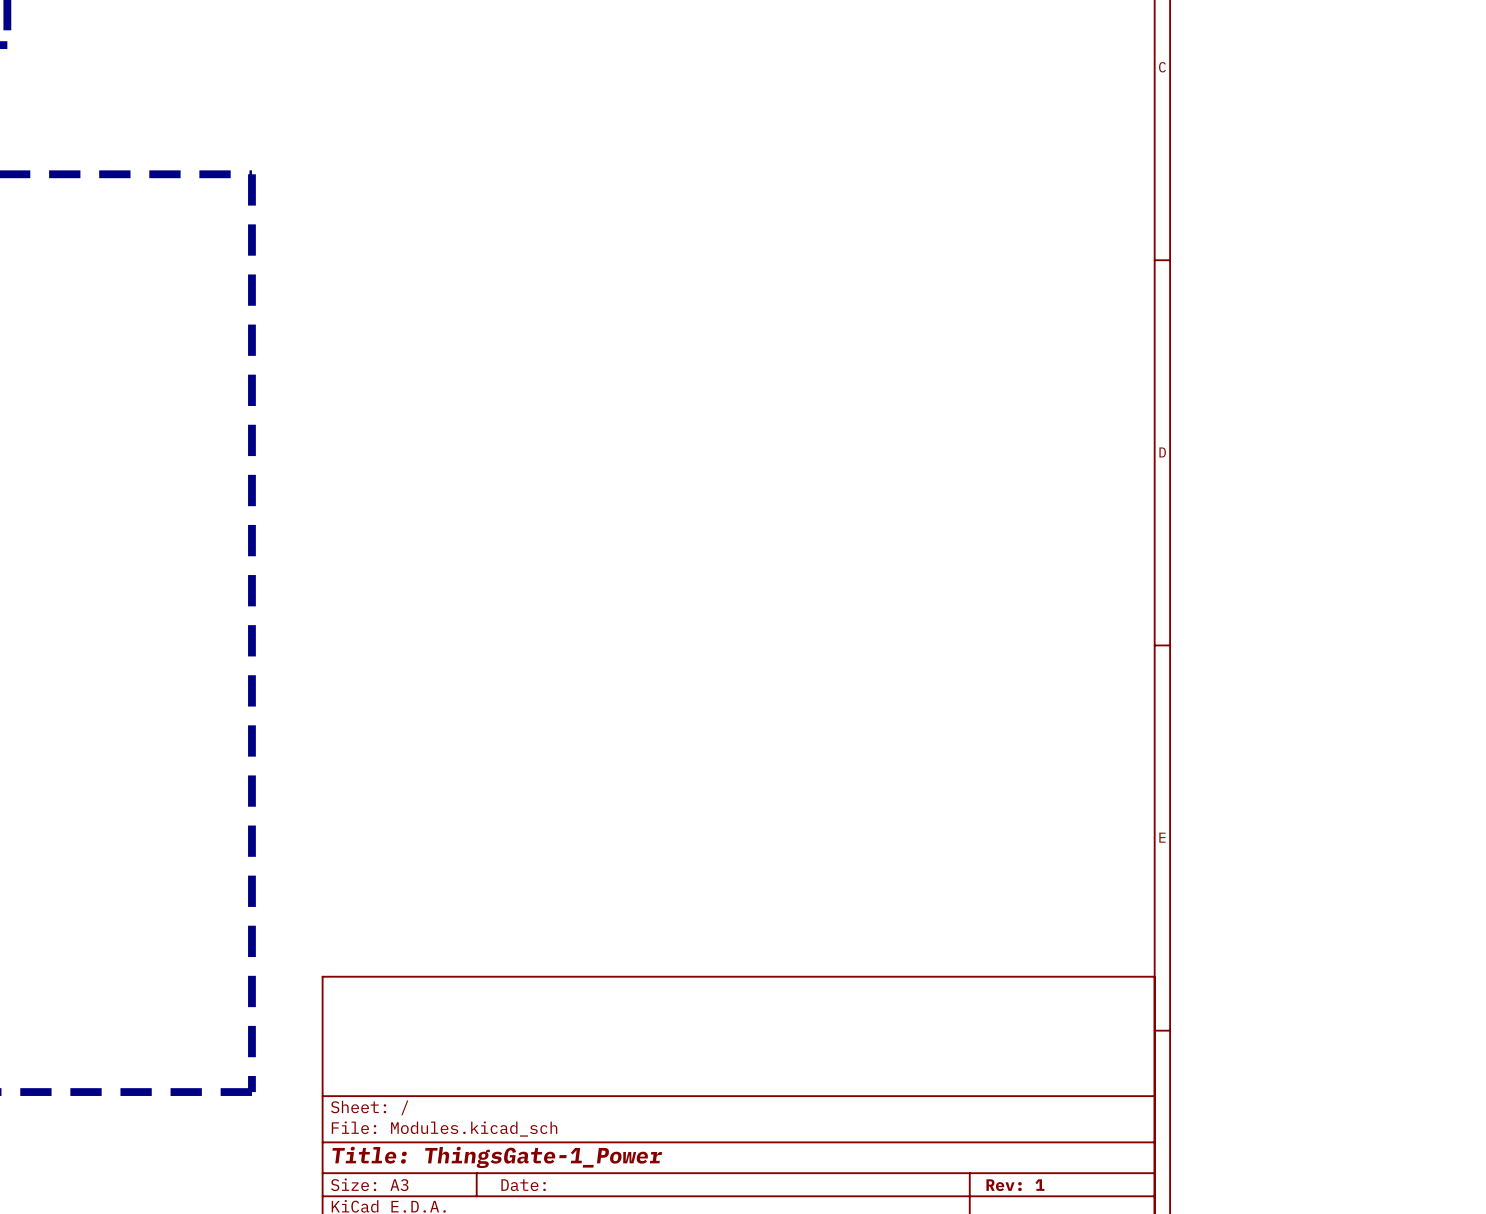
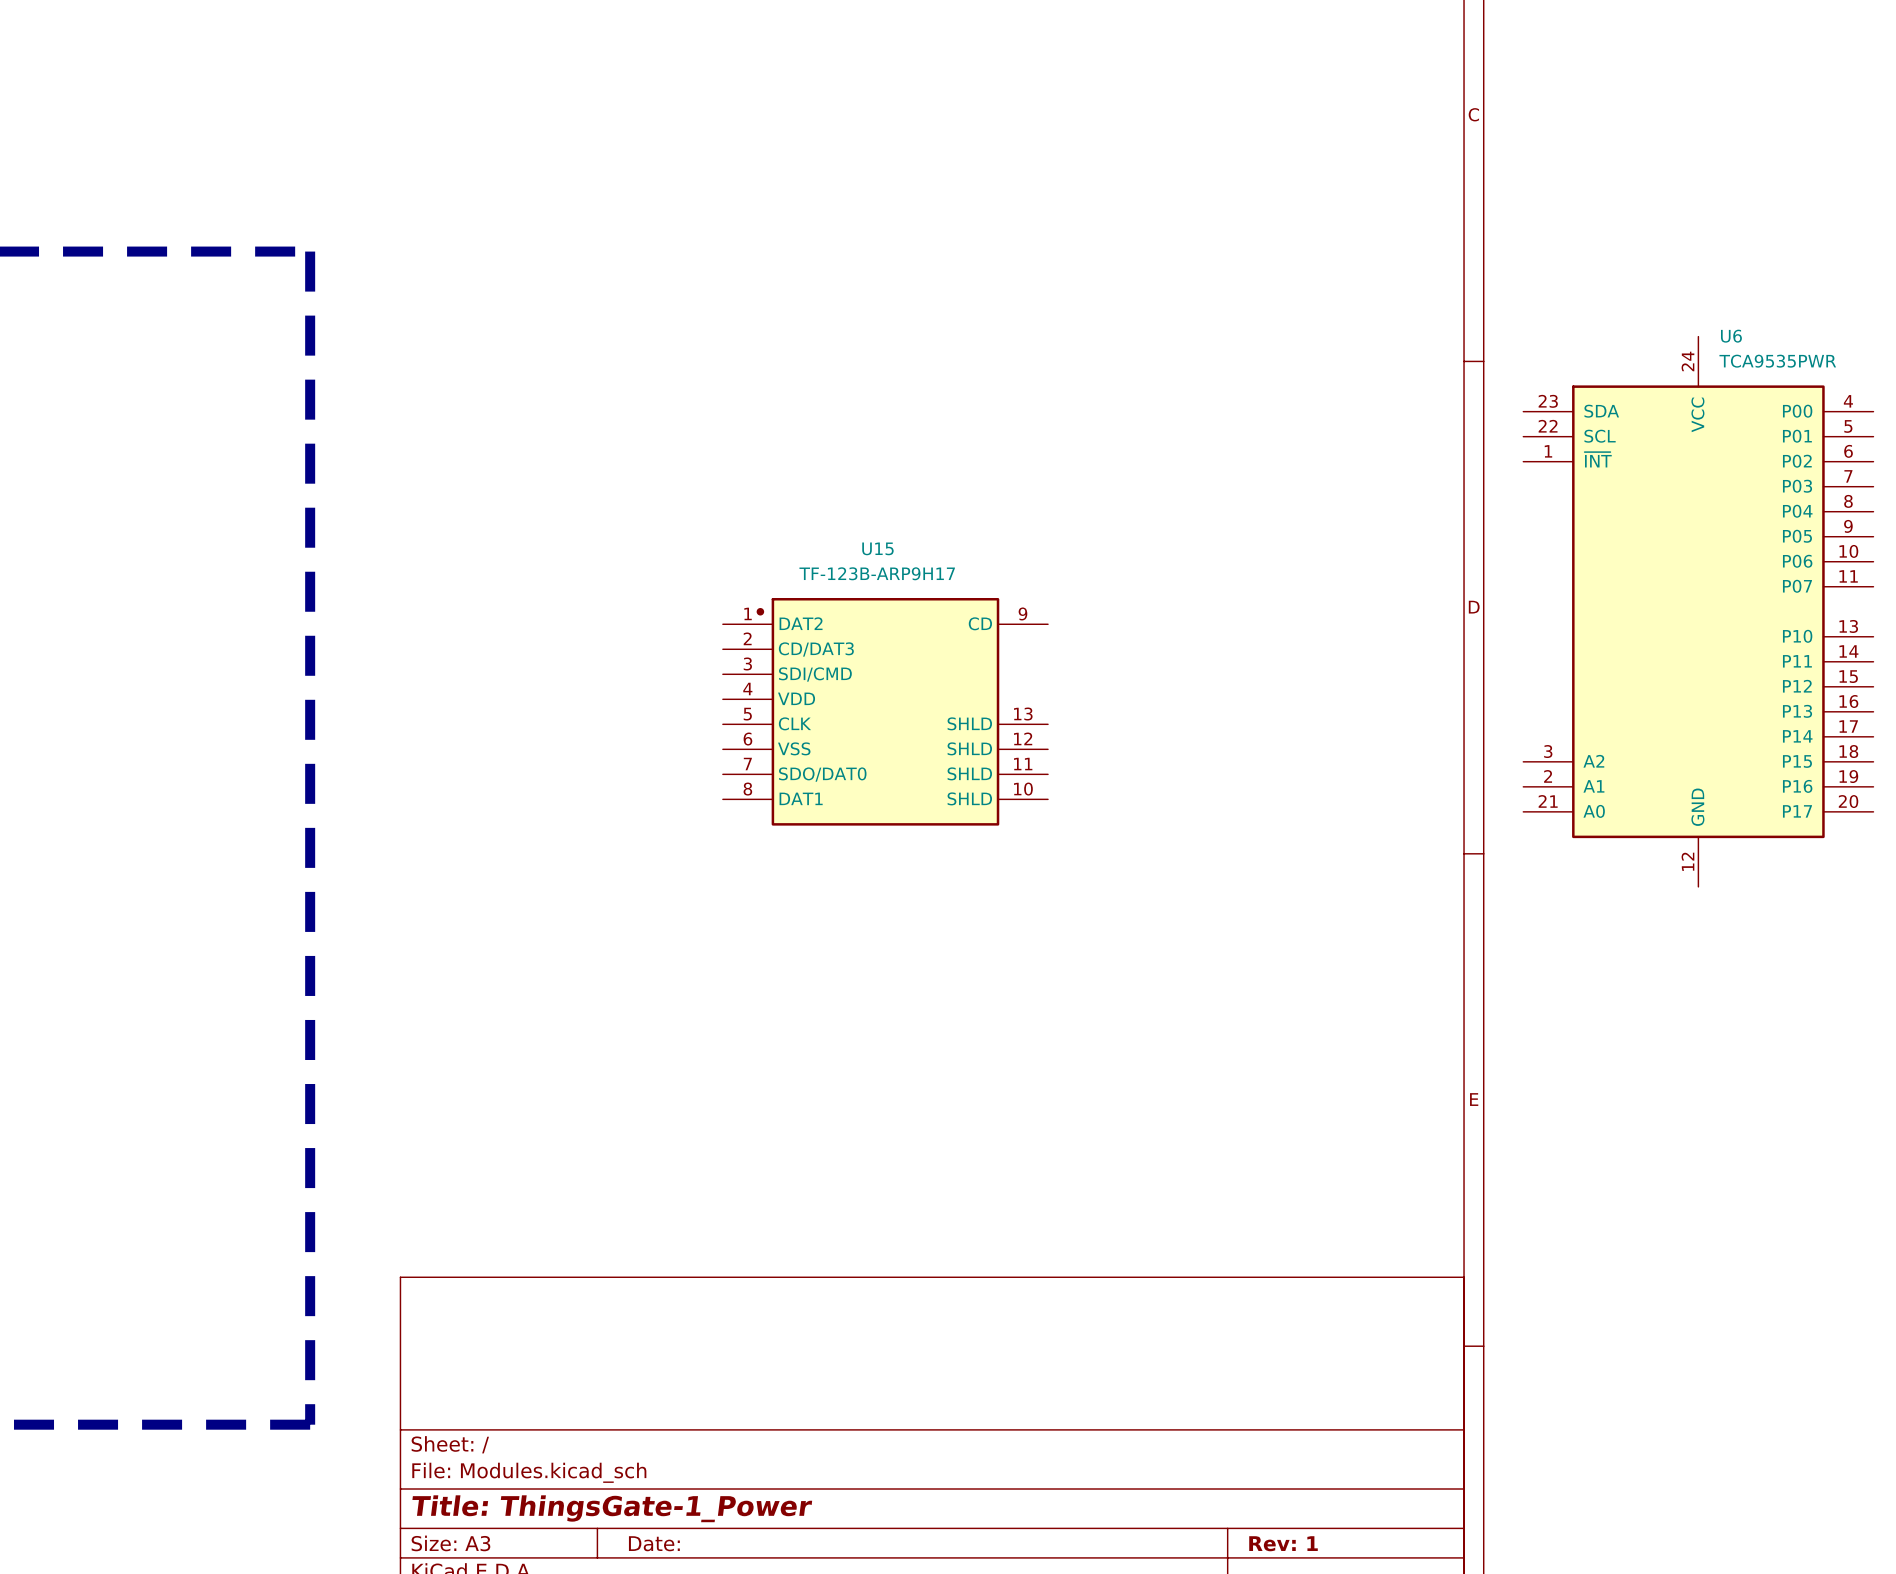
U6: none -> TCA9535PWR (1698, 611)
U15: none -> TF-123B-ARP9H17 (885, 711)

